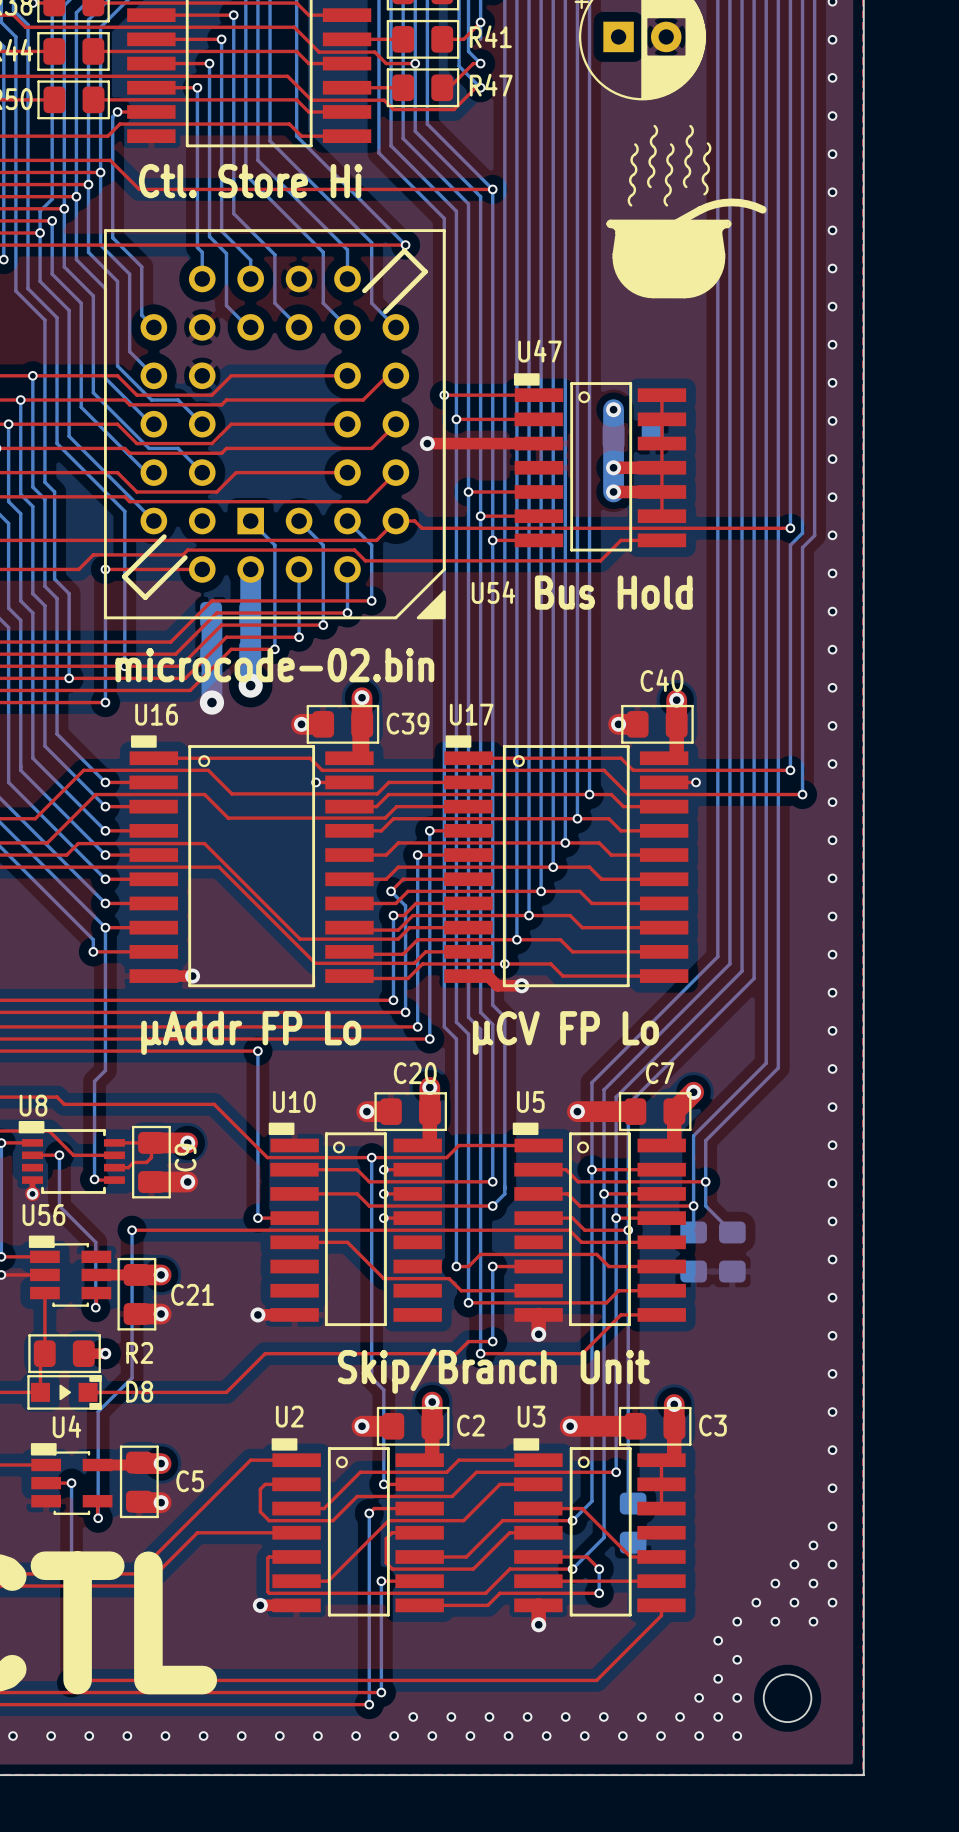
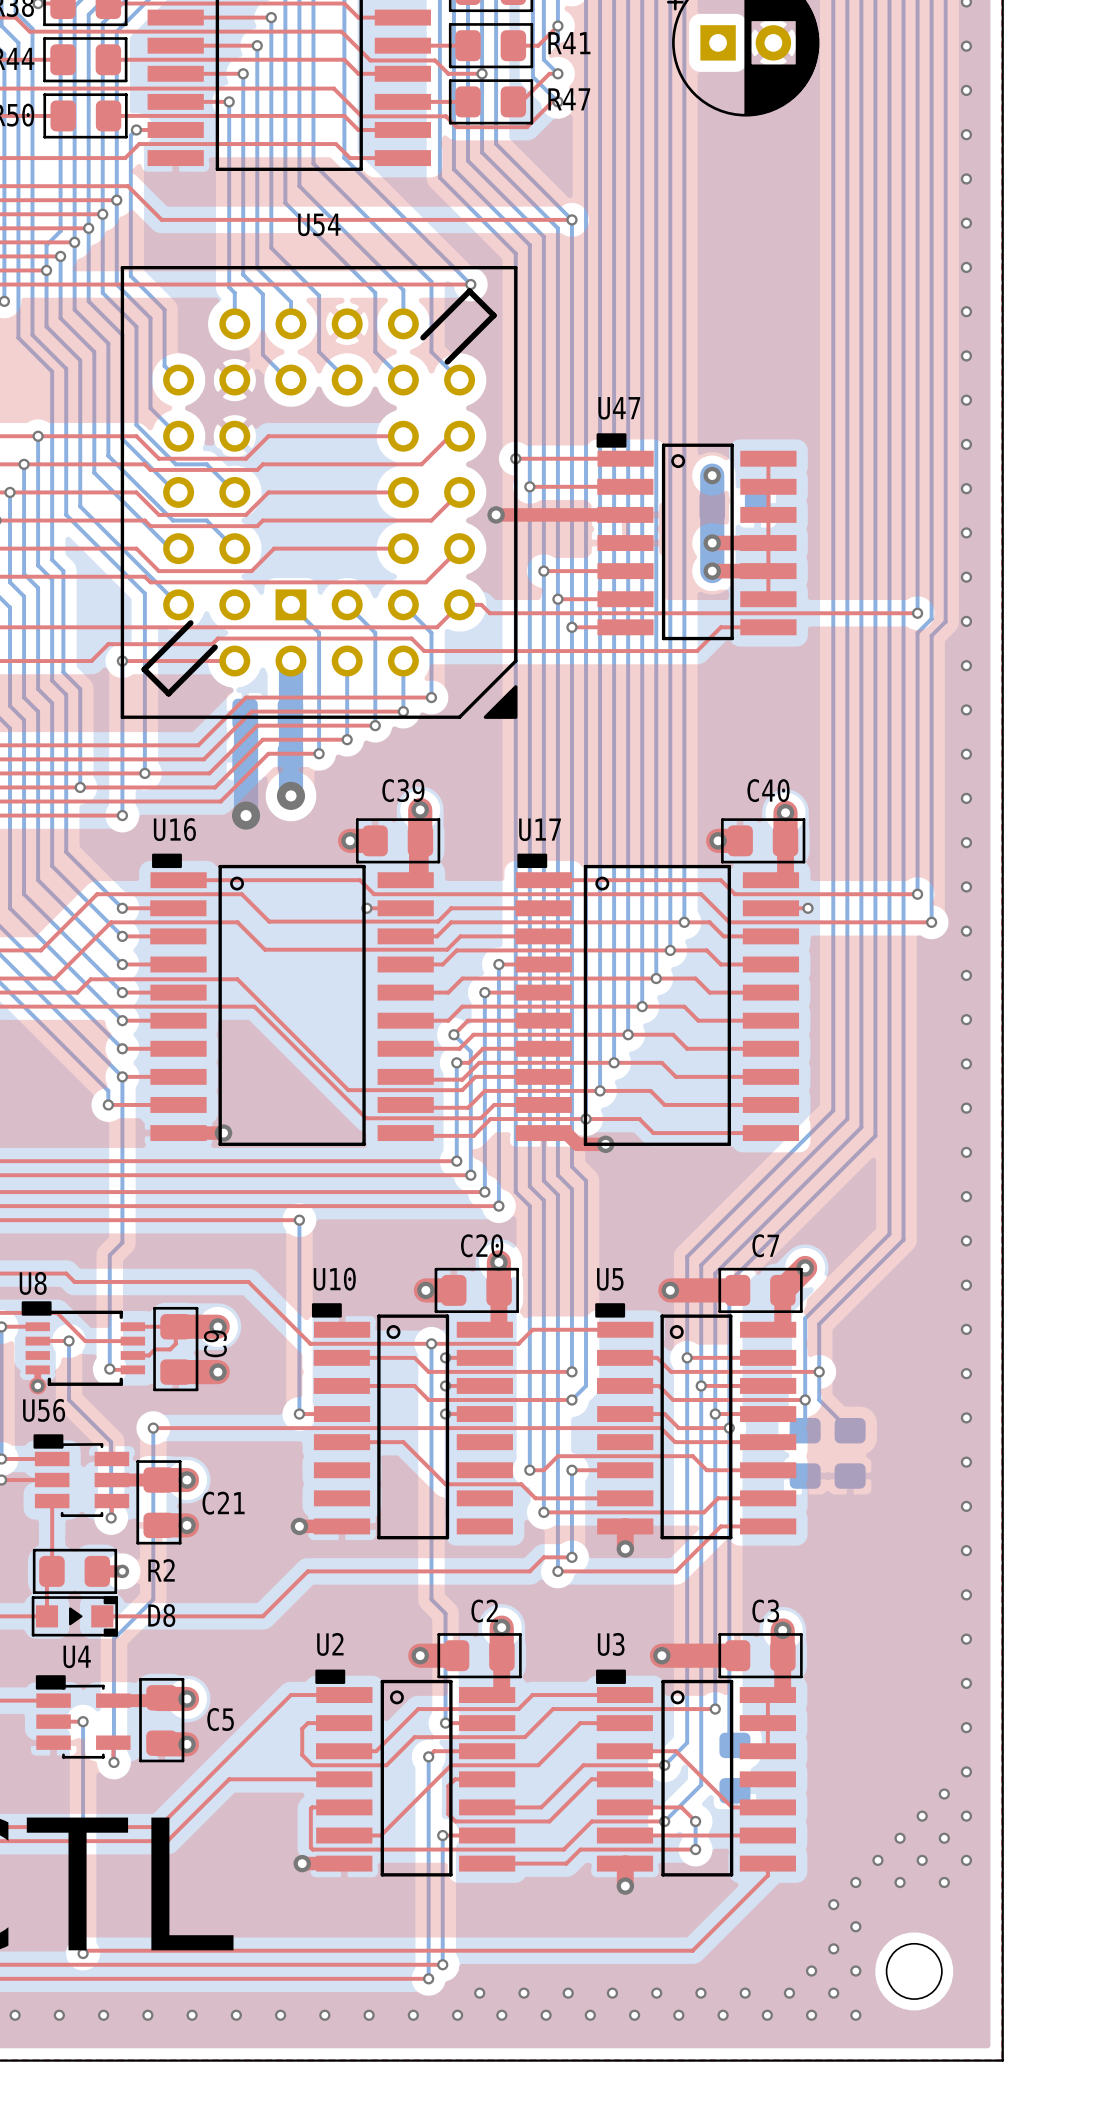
drawing: [606, 124, 767, 299] -> none
text: Ctl. Store Hi (250, 181) -> none
U54 name position: U54 (493, 592) -> U54 (319, 224)
text: Bus Hold (613, 592) -> none
text: microcode-02.bin (274, 665) -> none
C39 name position: C39 (408, 723) -> C39 (403, 790)
text: µAddr FP Lo (251, 1033) -> none
text: µCV FP Lo (565, 1033) -> none
text: Skip/Branch Unit (493, 1371) -> none
C2 name position: C2 (470, 1425) -> C2 (484, 1611)
C3 name position: C3 (712, 1425) -> C3 (765, 1611)

